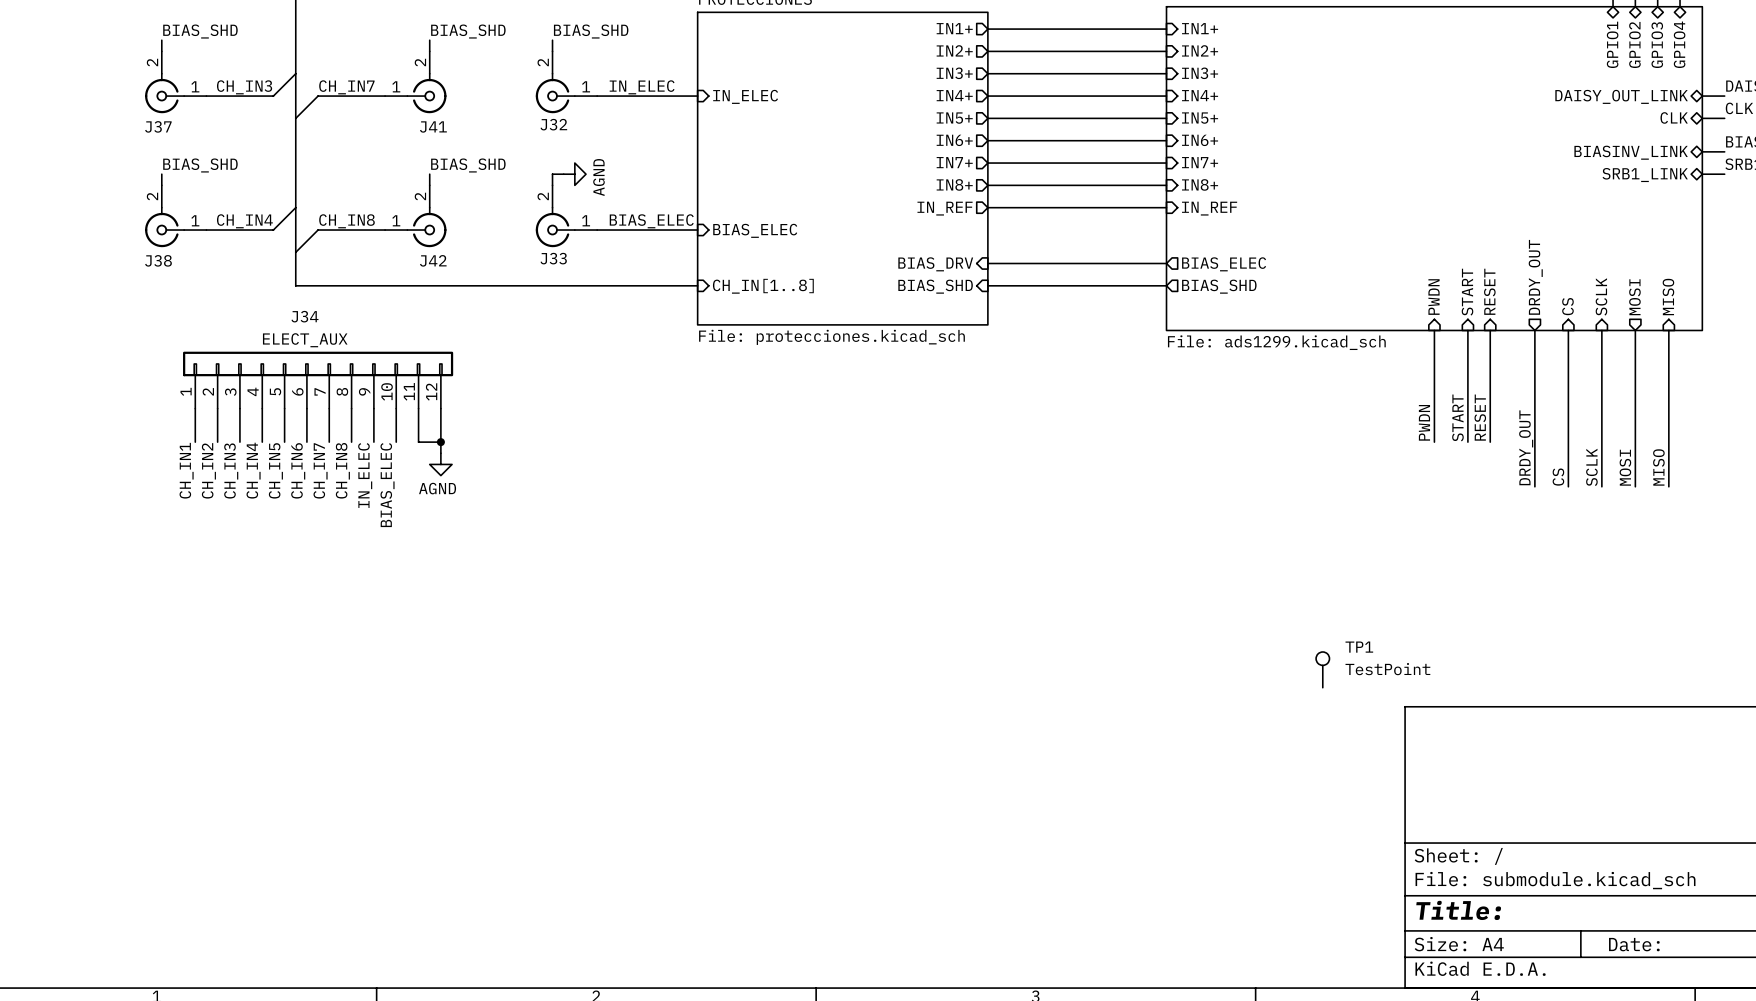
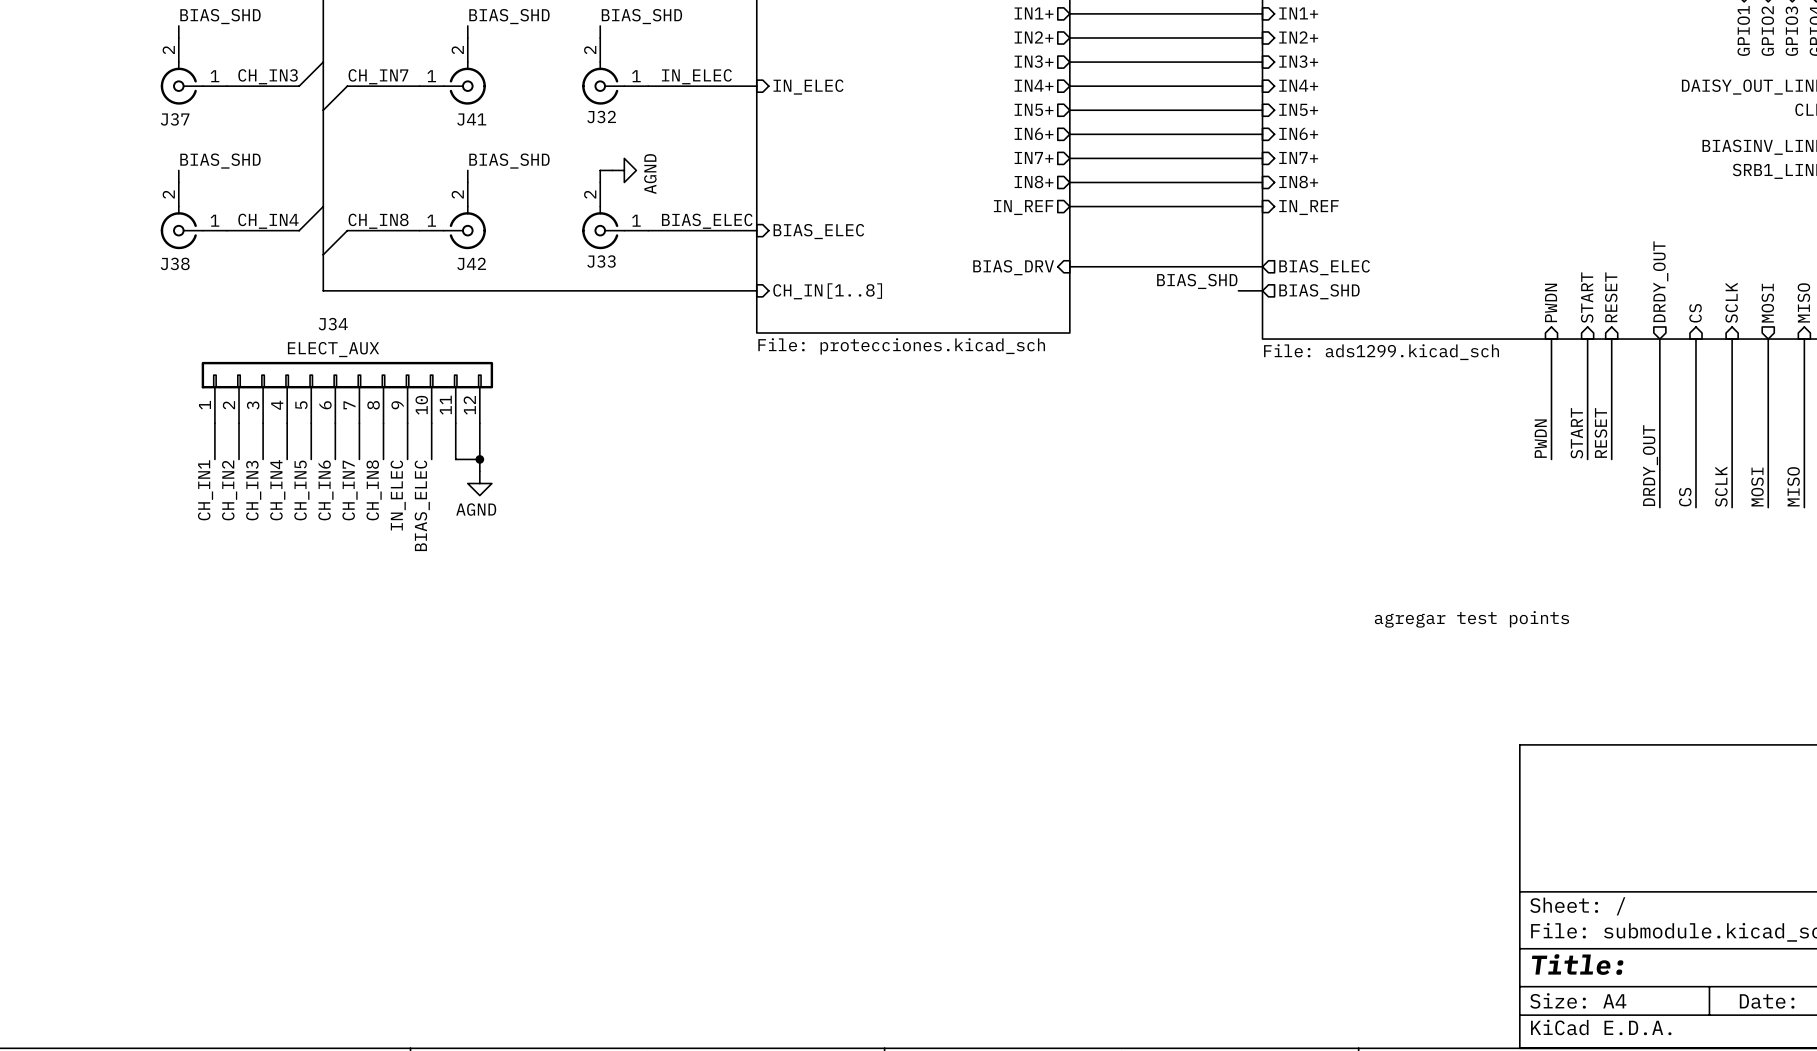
label: none -> BIAS_SHD (1197, 281)
wire: (987, 285) (1144, 285) -> none
sheet pin: BIAS_SHD (935, 286) -> none
text: none -> agregar test points (1471, 619)
TP1: TestPoint (1322, 669) -> none

